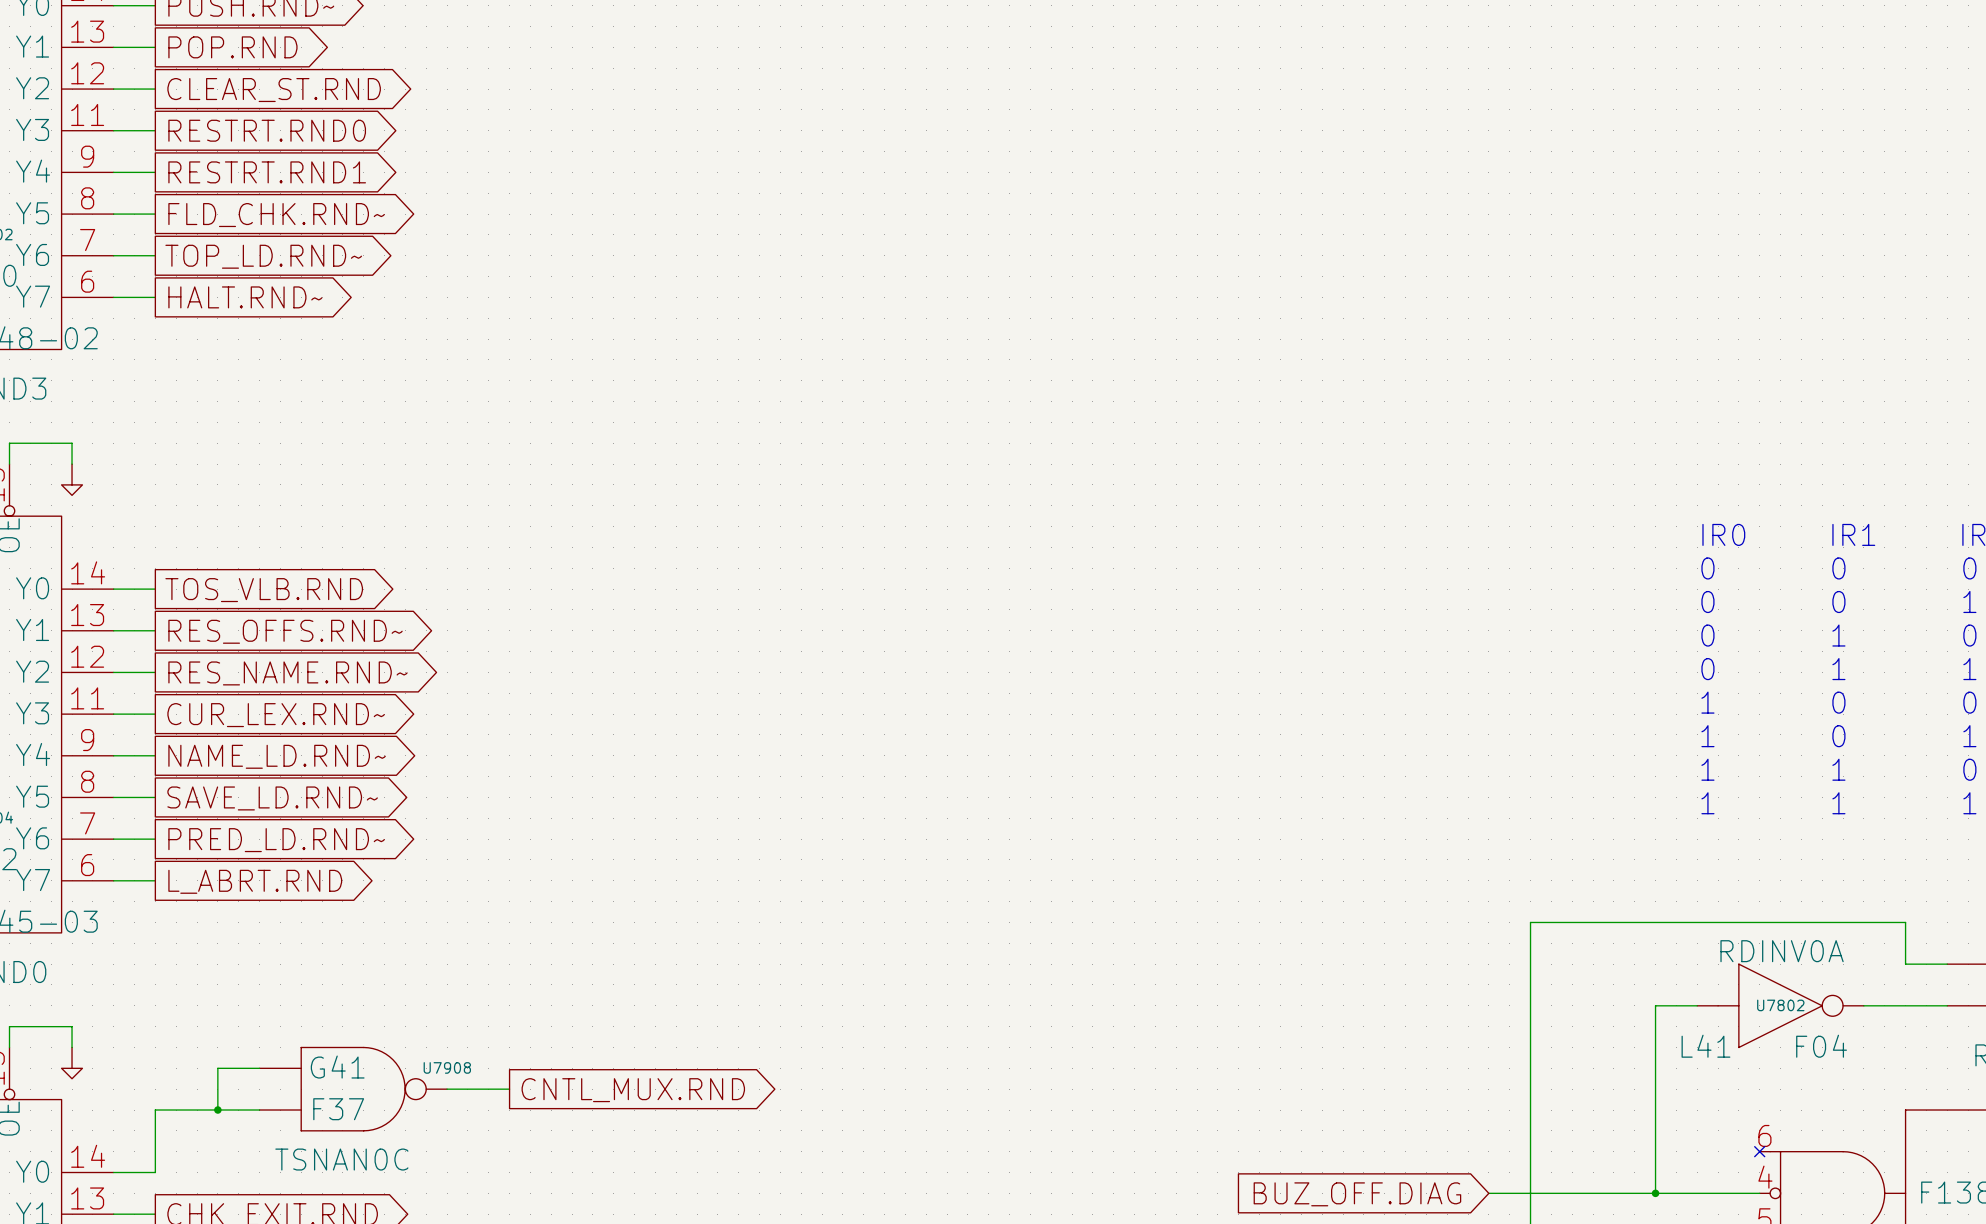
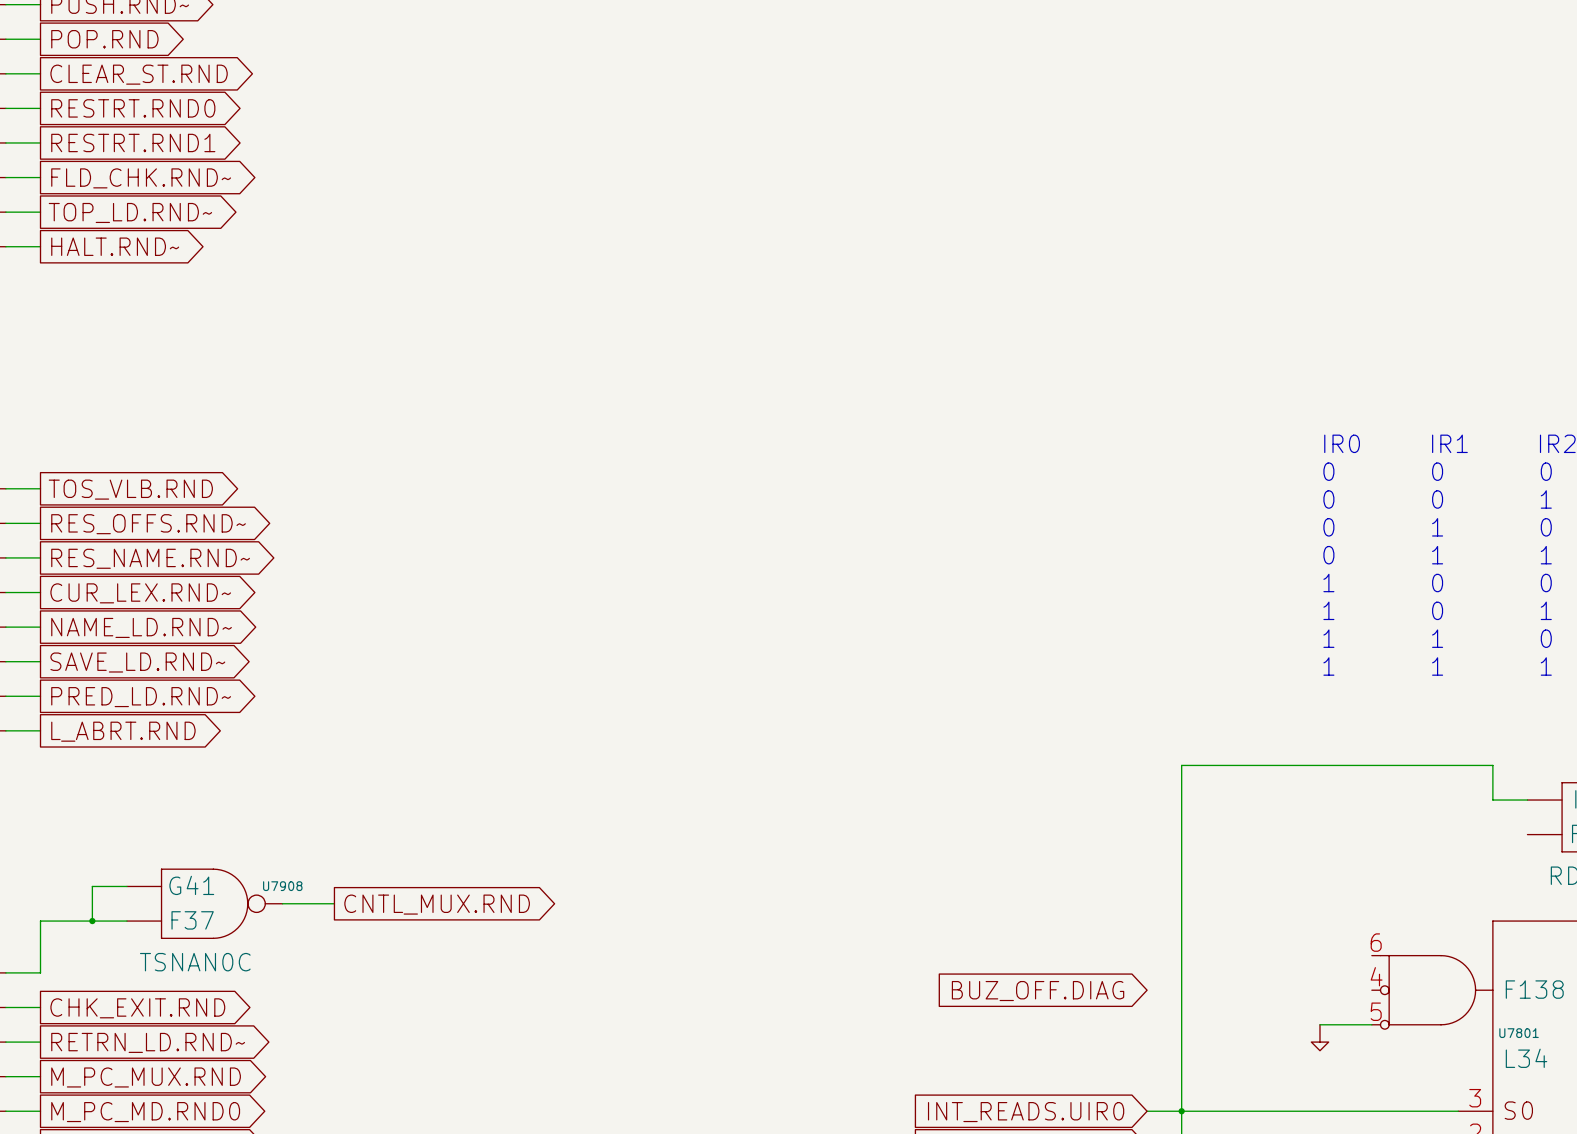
wire: (1697, 1005) (1655, 1005) (1655, 1193) -> none
U7802: F04 (1780, 1005) -> none
wire: (1863, 1005) (1947, 1005) -> none
no-connect mark: (1759, 1151) -> none
wire: (1488, 1193) (1759, 1193) -> none
junction: (1655, 1193) -> none

